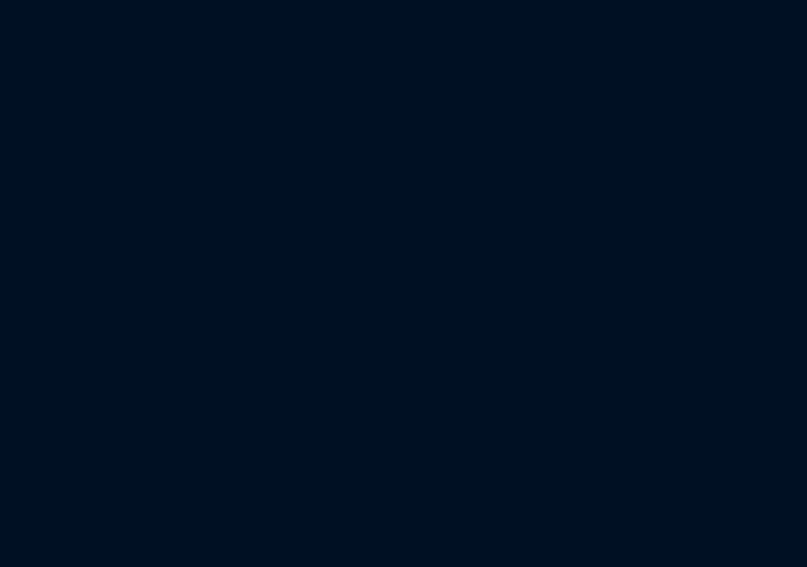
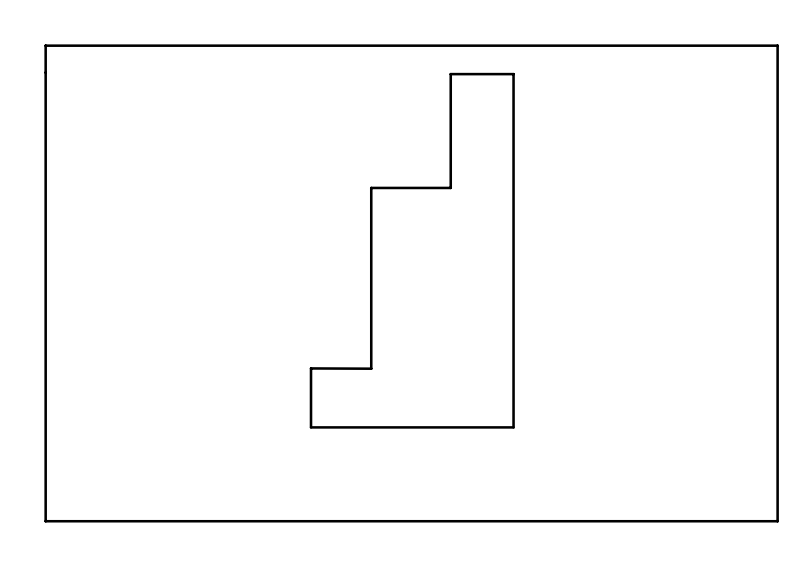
board edge: none -> (45, 45) (777, 45) (777, 521) (45, 521) (45, 45)
board edge: none -> (450, 74) (450, 187) (371, 187) (371, 368) (311, 368) (311, 427) (513, 427) (513, 74) (450, 74)

